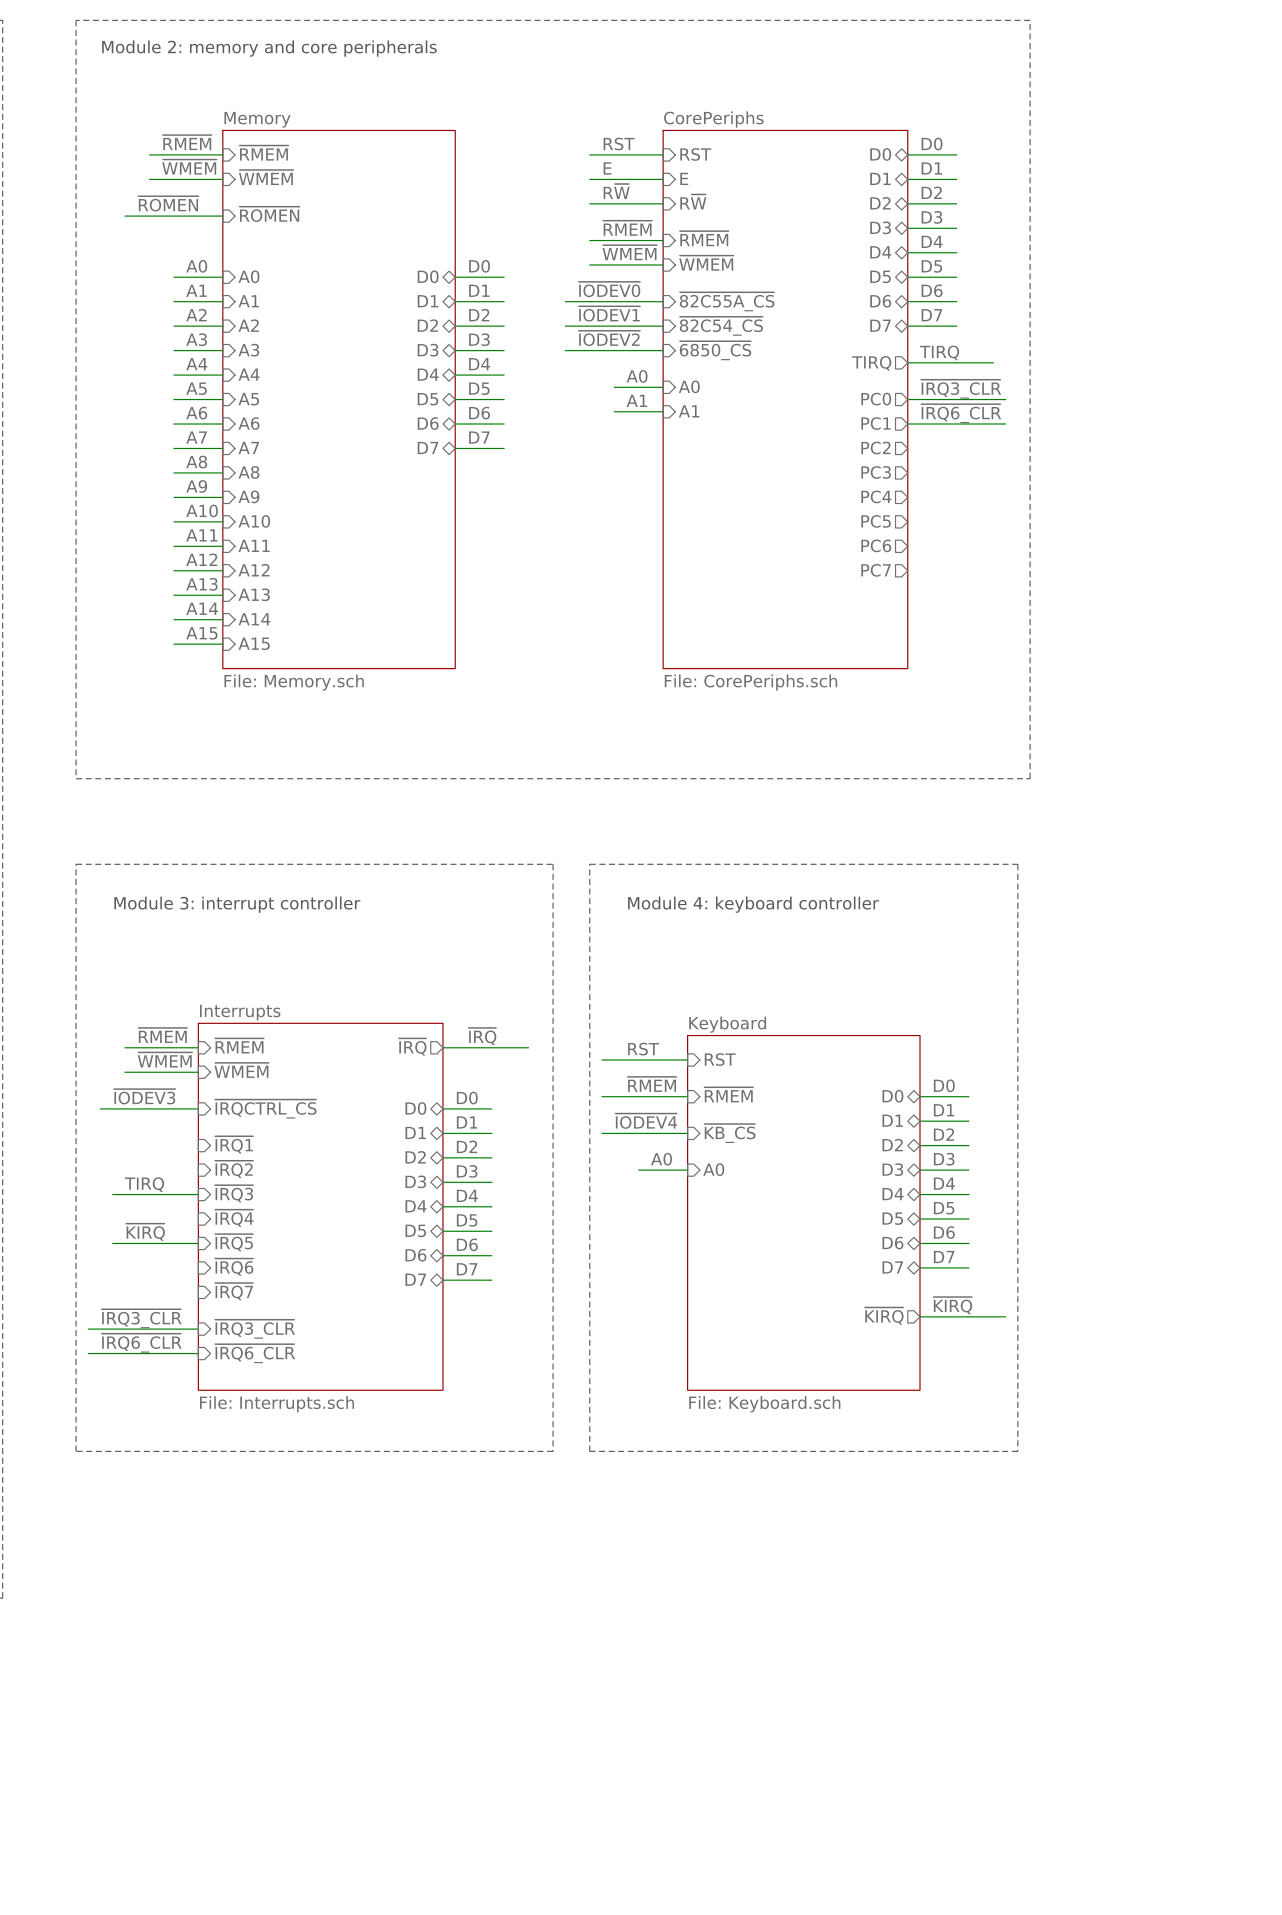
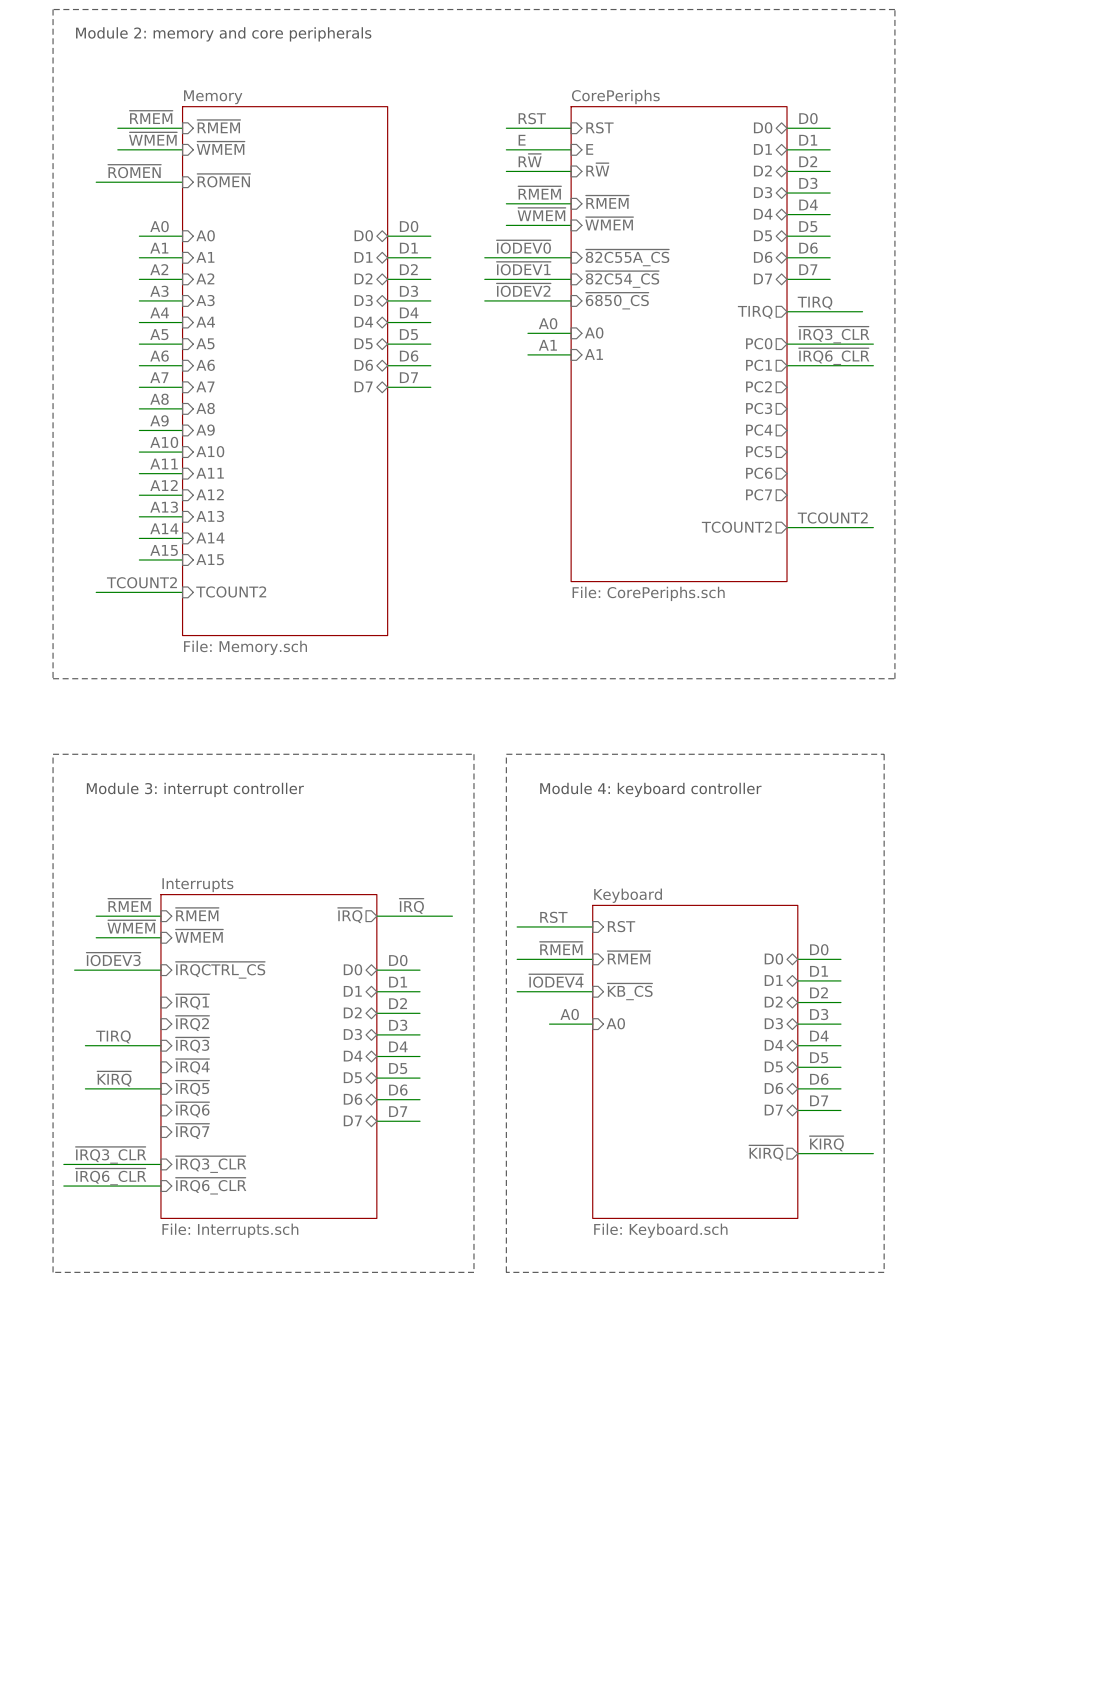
sheet Memory: File: Memory.sch (339, 399) -> none
sheet Memory: none -> File: Memory.sch (285, 371)
label: none -> TCOUNT2 (832, 517)
sheet pin: none -> TCOUNT2 (736, 527)
wire: none -> (787, 527) (873, 527)
label: none -> TCOUNT2 (141, 582)
wire: none -> (96, 592) (182, 592)
sheet pin: none -> TCOUNT2 (231, 591)

